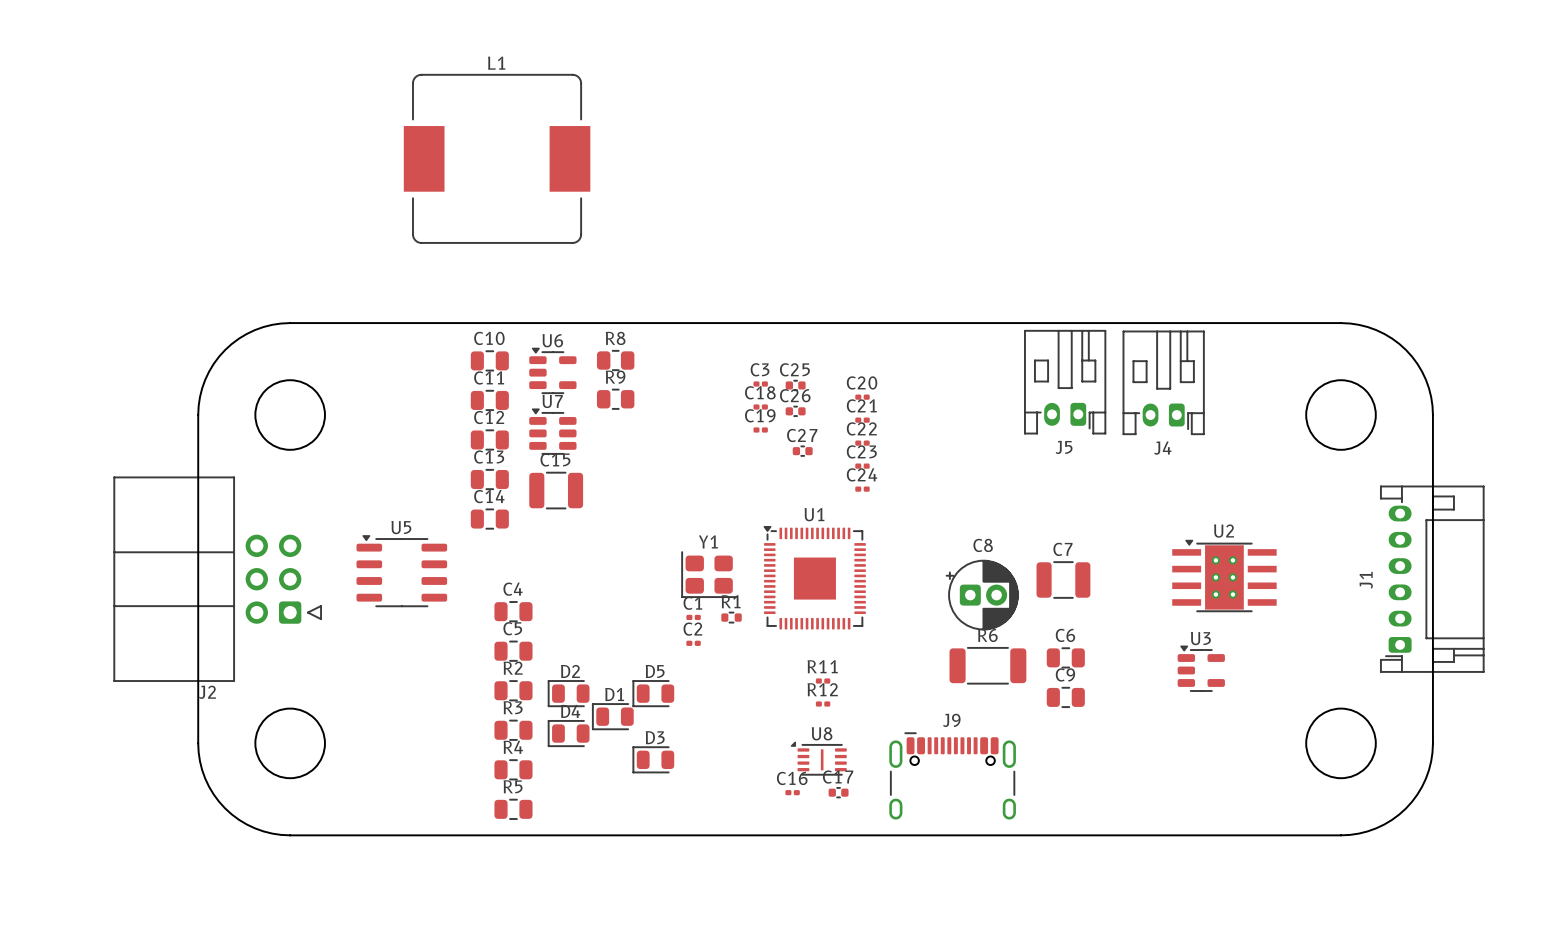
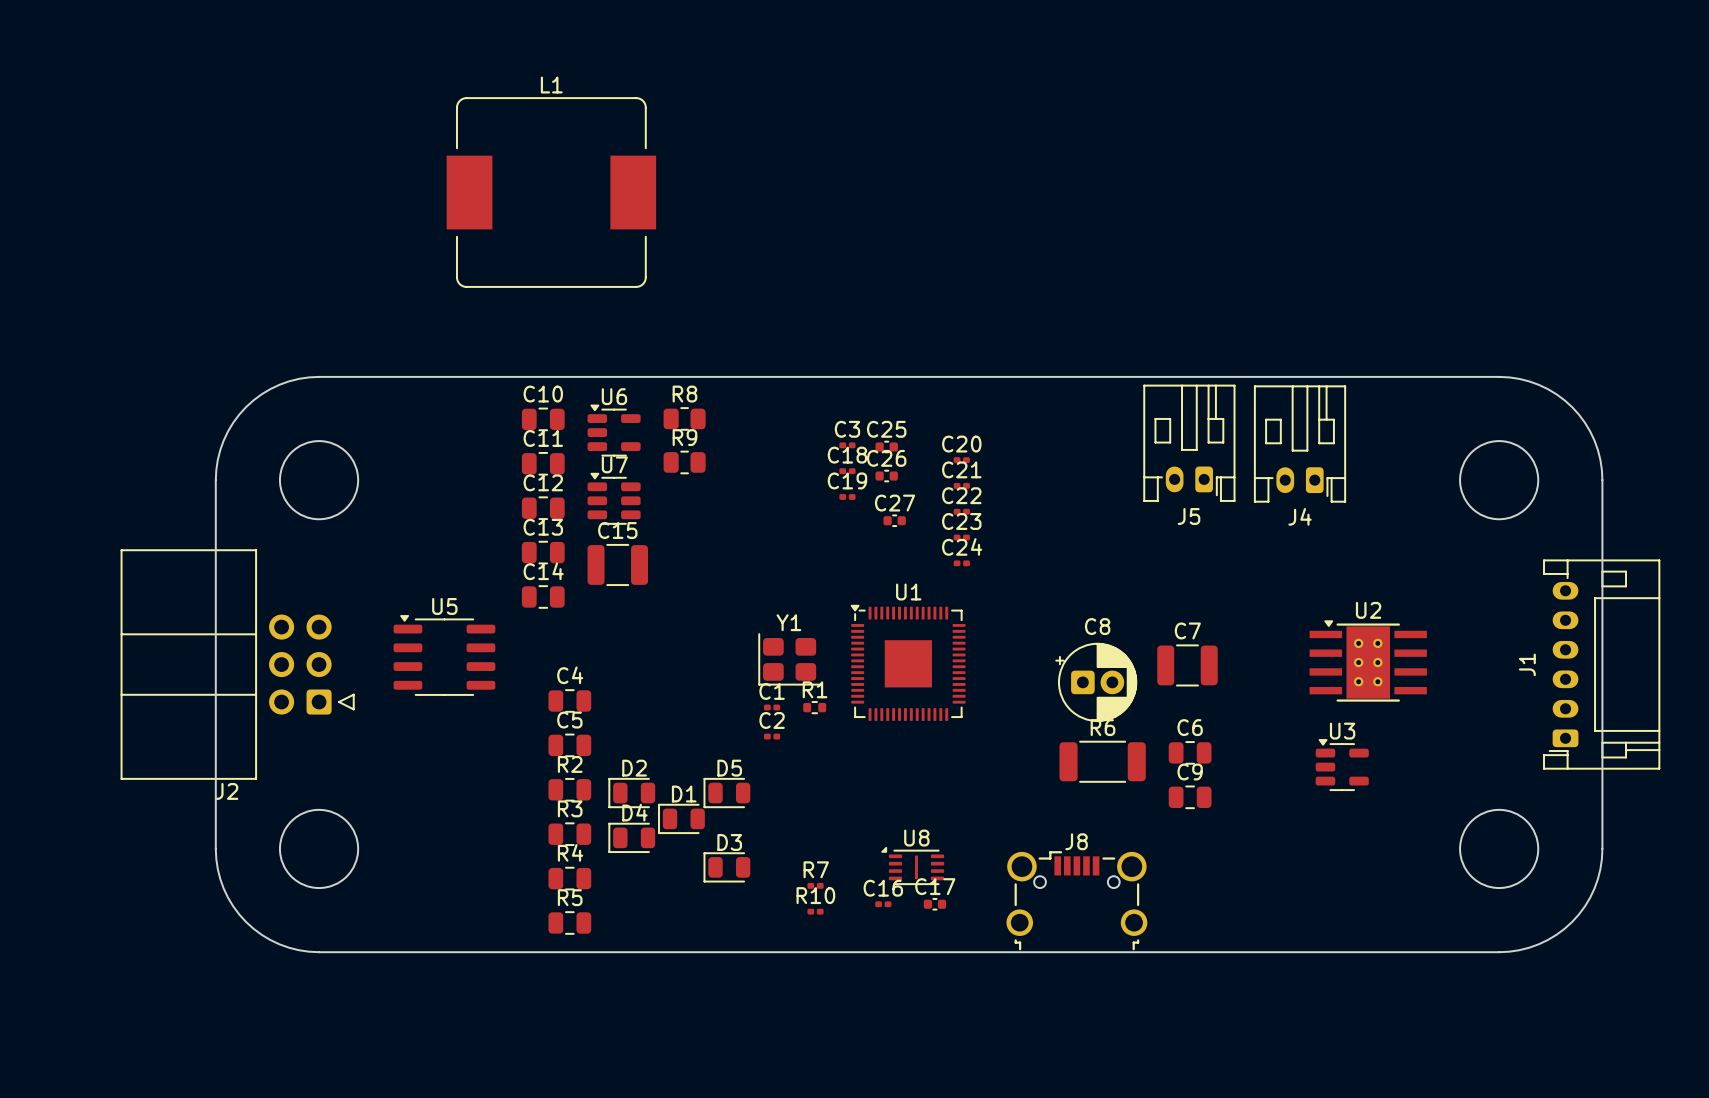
R11: (823, 681) -> none
R12: (823, 703) -> none
R7: none -> (815, 885)
J9: (952, 776) -> none
J8: none -> (1076, 900)
R10: none -> (815, 911)

